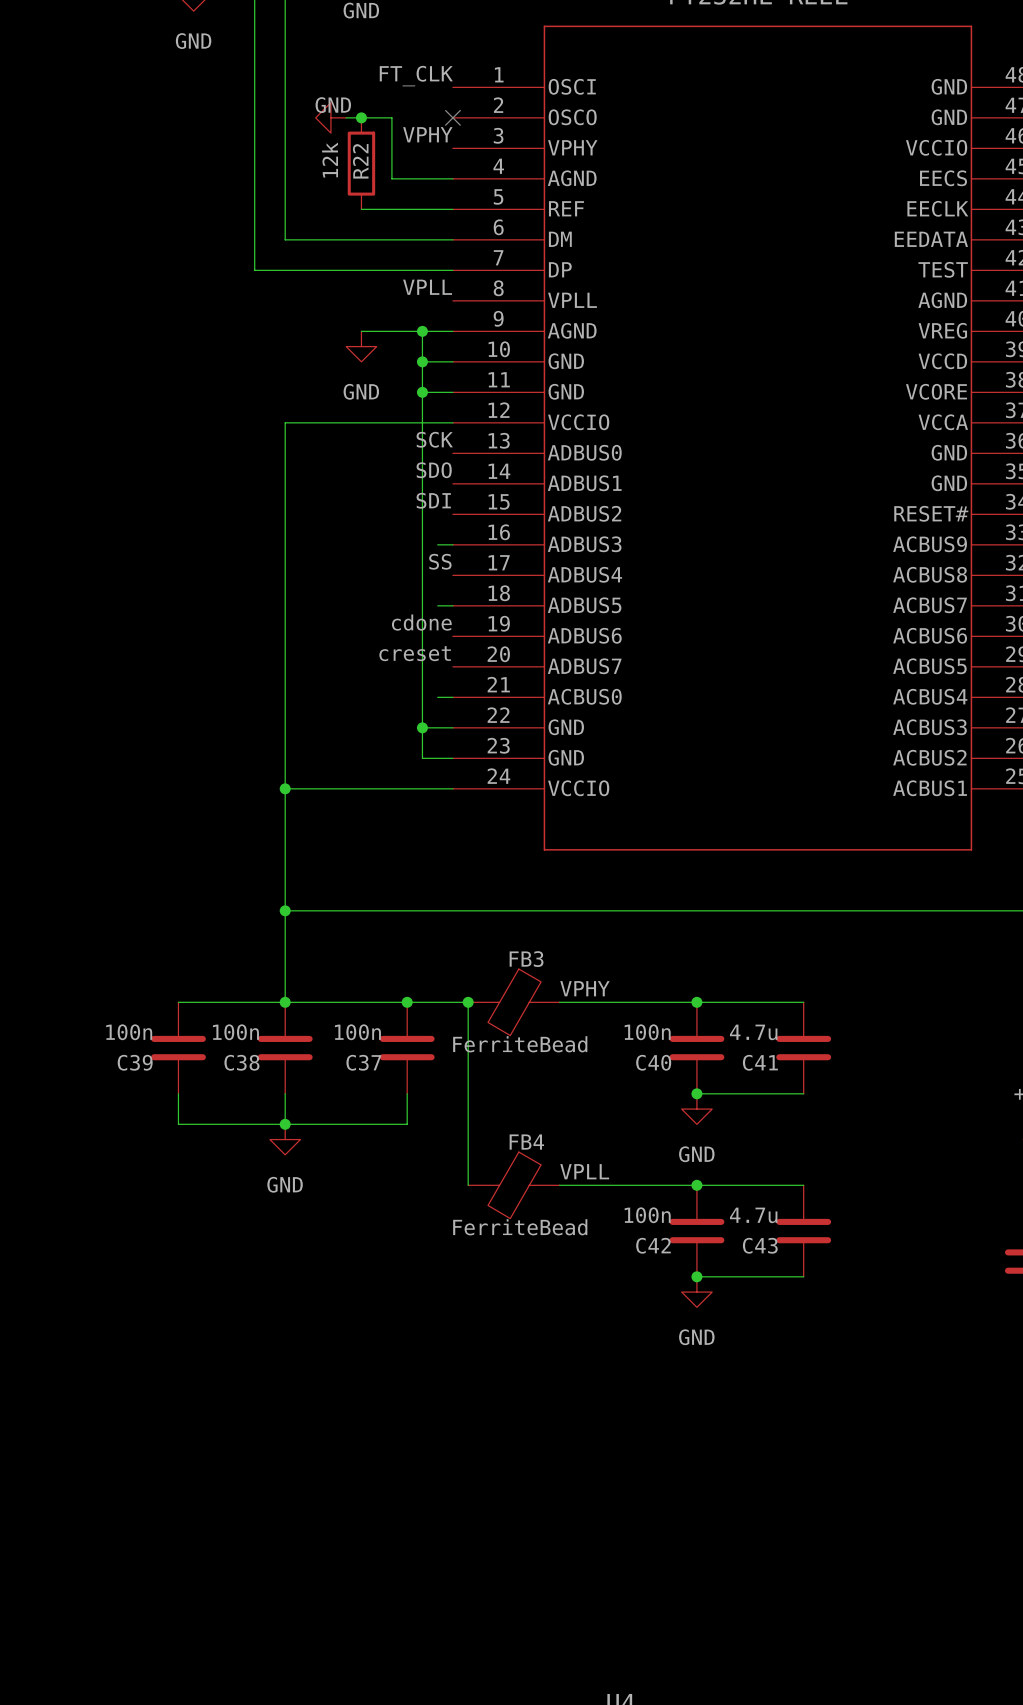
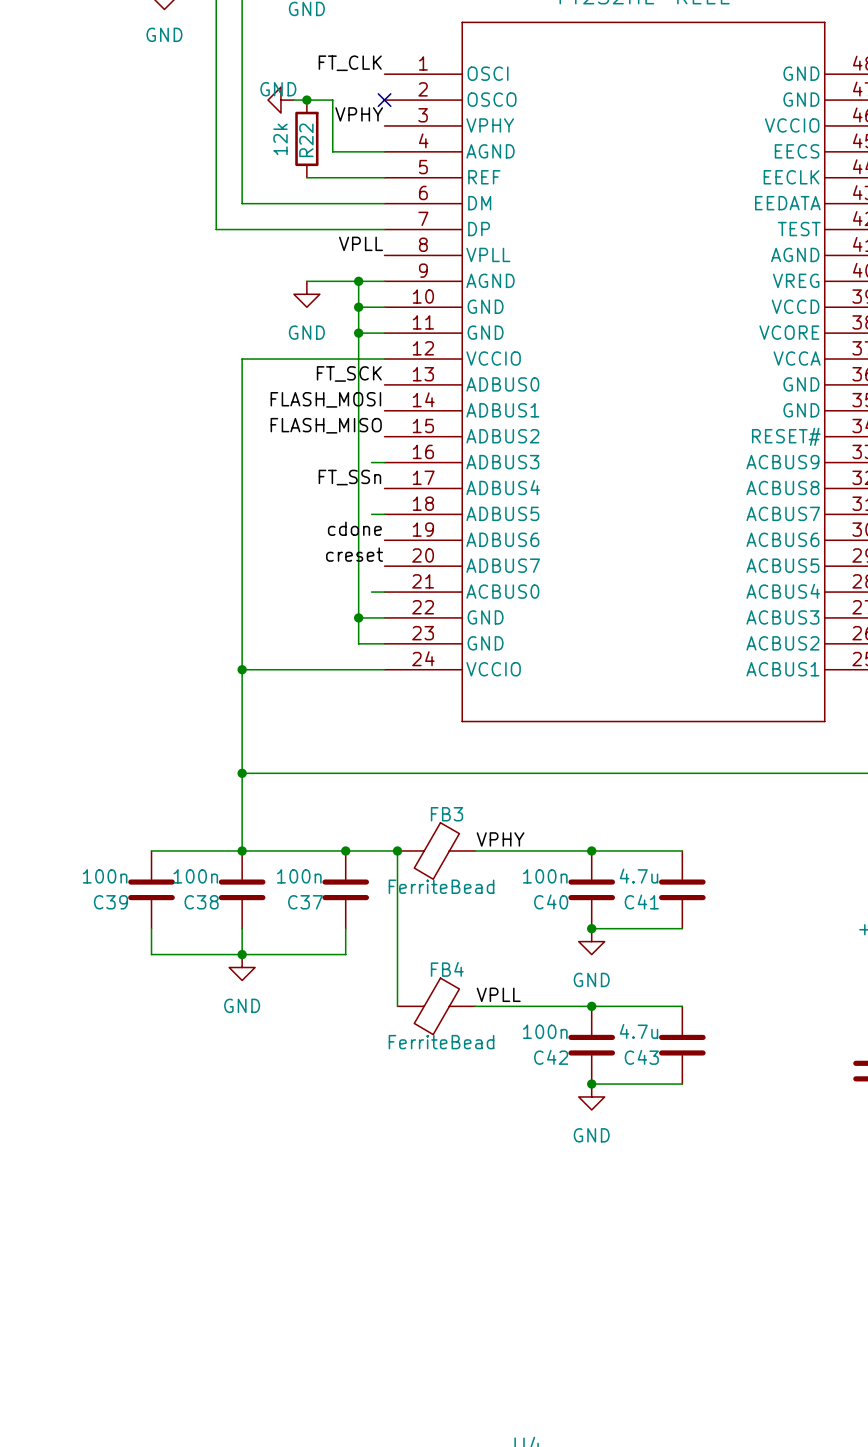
label: SCK (434, 439) -> FT_SCK (349, 373)
label: SDO (434, 470) -> FLASH_MOSI (325, 399)
label: SDI (433, 500) -> FLASH_MISO (326, 425)
label: SS (440, 561) -> FT_SSn (349, 477)

